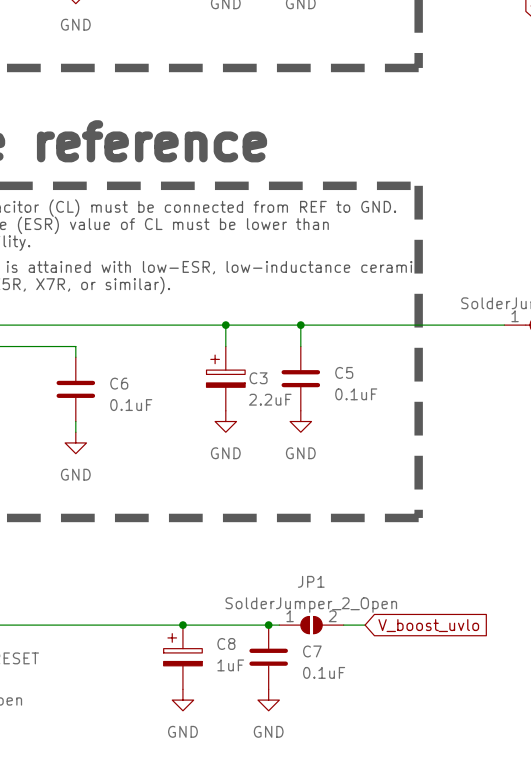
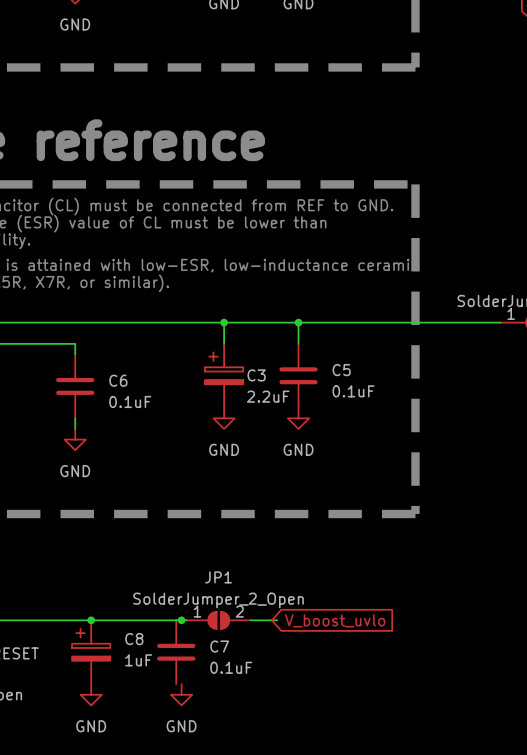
junction: none -> (91, 620)
junction: (268, 625) -> none
JP1 position: (311, 625) -> (218, 620)
wire: (343, 625) (365, 625) -> none
global label position: V_boost_uvlo (428, 625) -> V_boost_uvlo (335, 620)
C8 position: (182, 657) -> (91, 652)
C7 position: (268, 657) -> (176, 652)
power symbol position: GND (268, 700) -> GND (91, 694)

